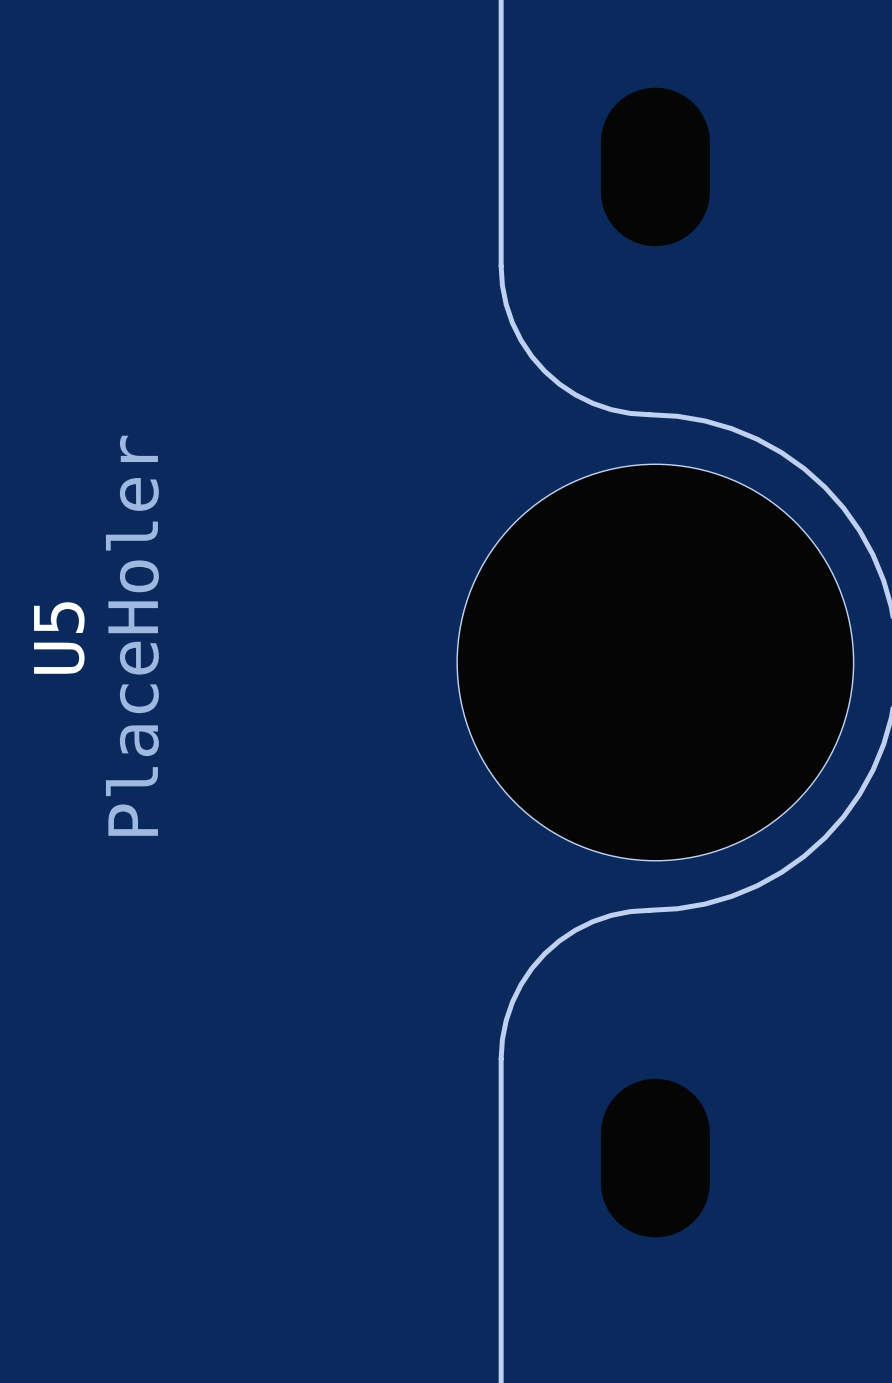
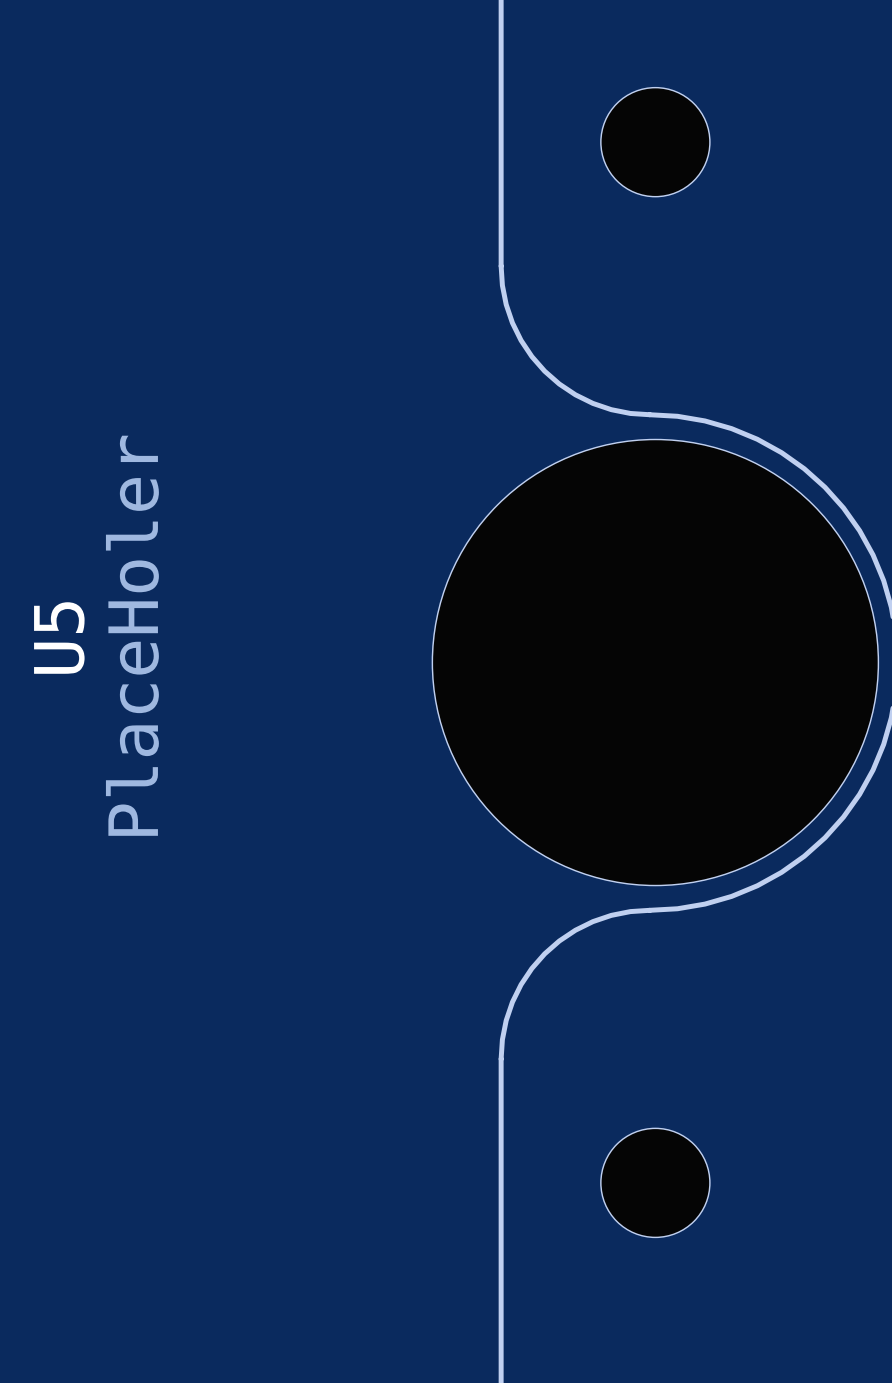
U5 footprint: [457, 87, 854, 1238] -> [432, 87, 879, 1238]

